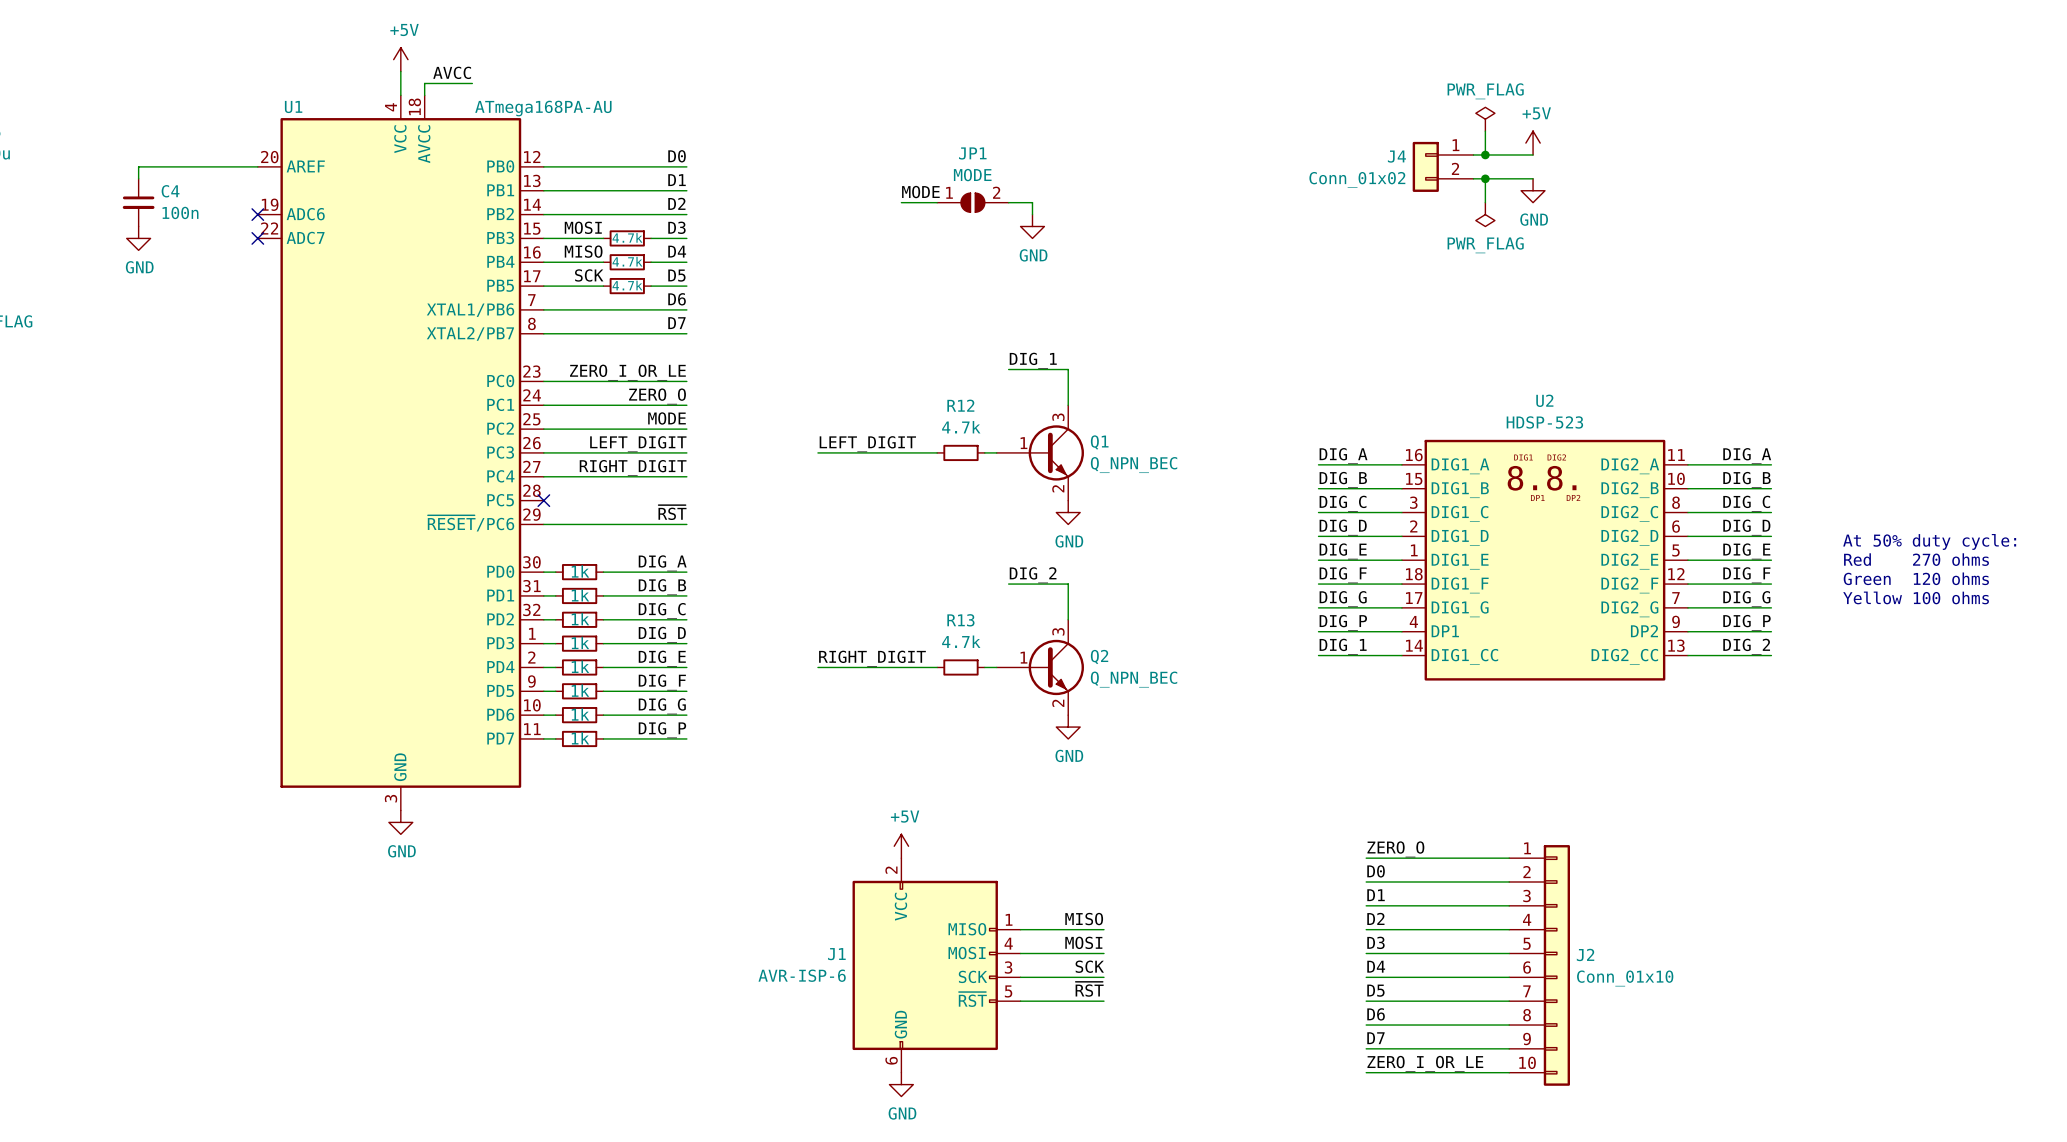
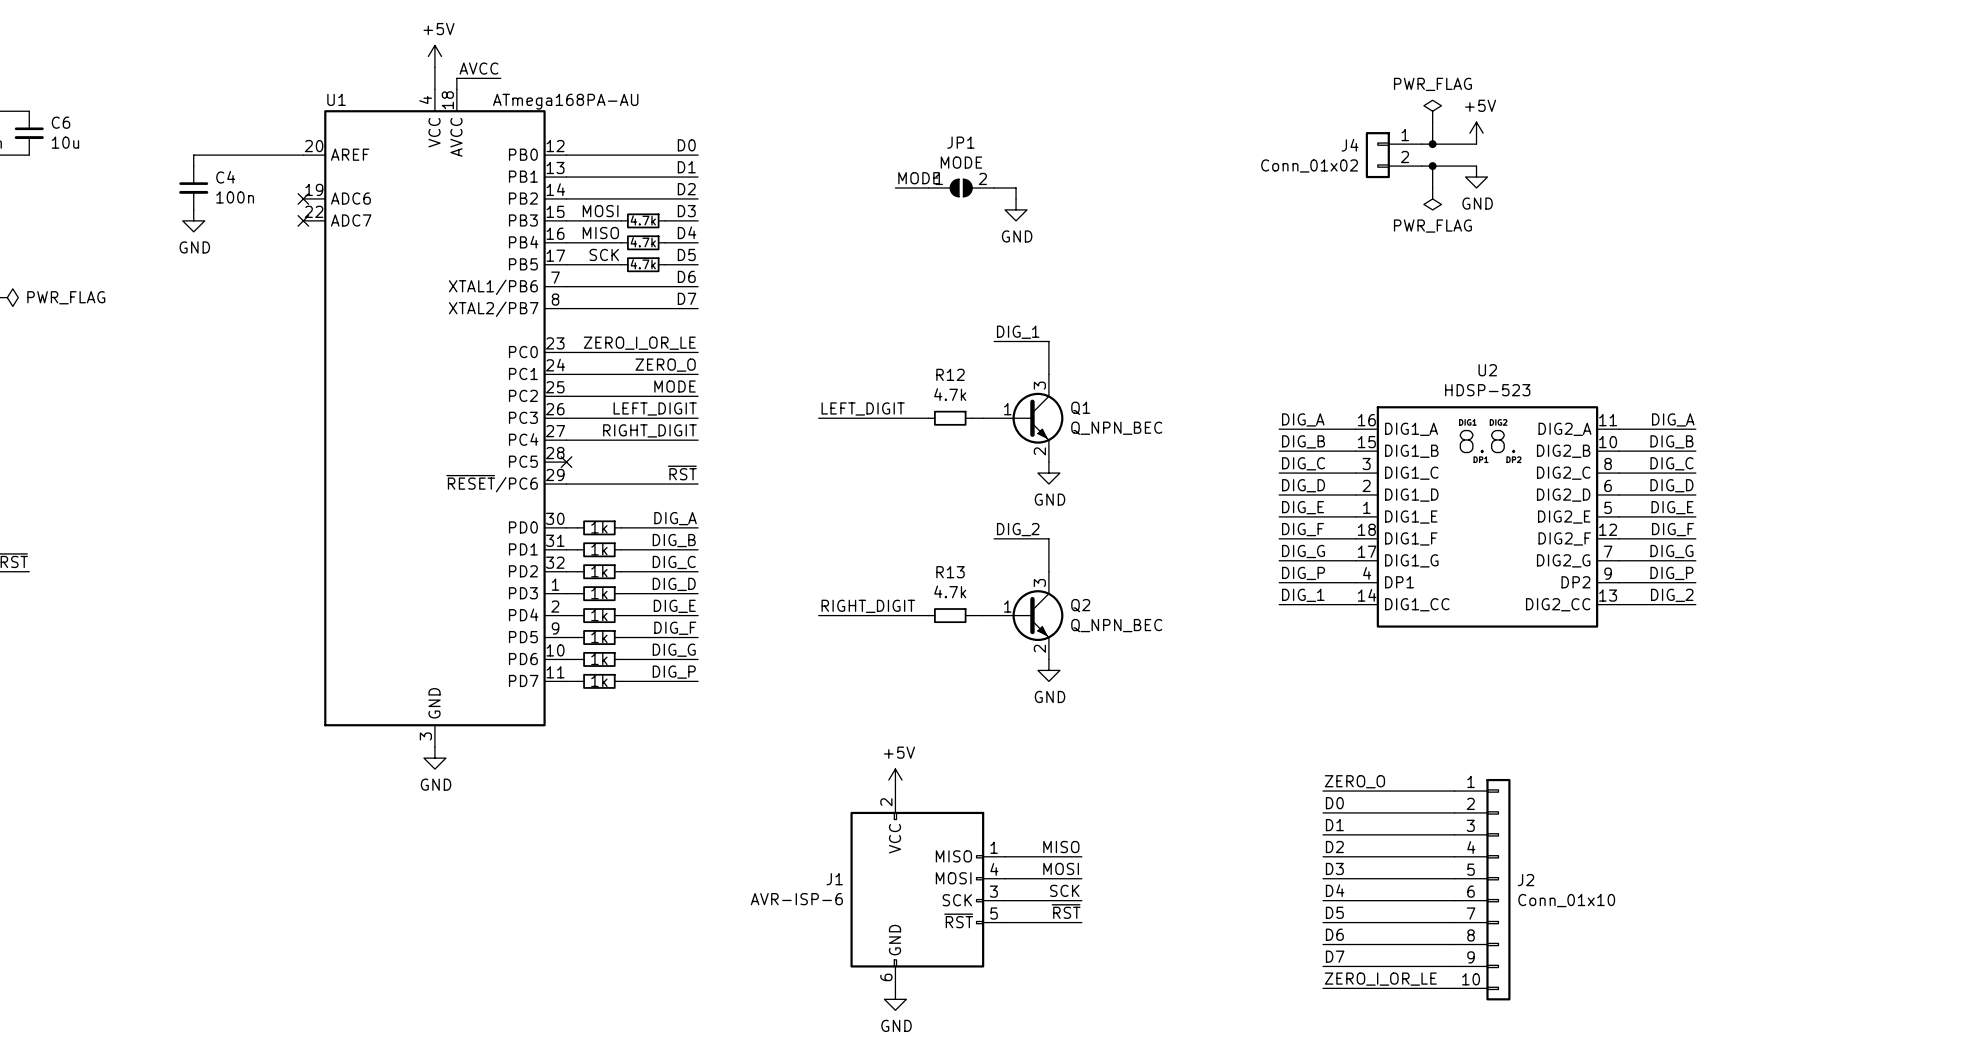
text: At 50% duty cycle: (1929, 541) -> none
text: Red 270 ohms (1916, 559) -> none
text: Green 120 ohms (1916, 578) -> none
text: Yellow 100 ohms (1916, 597) -> none

